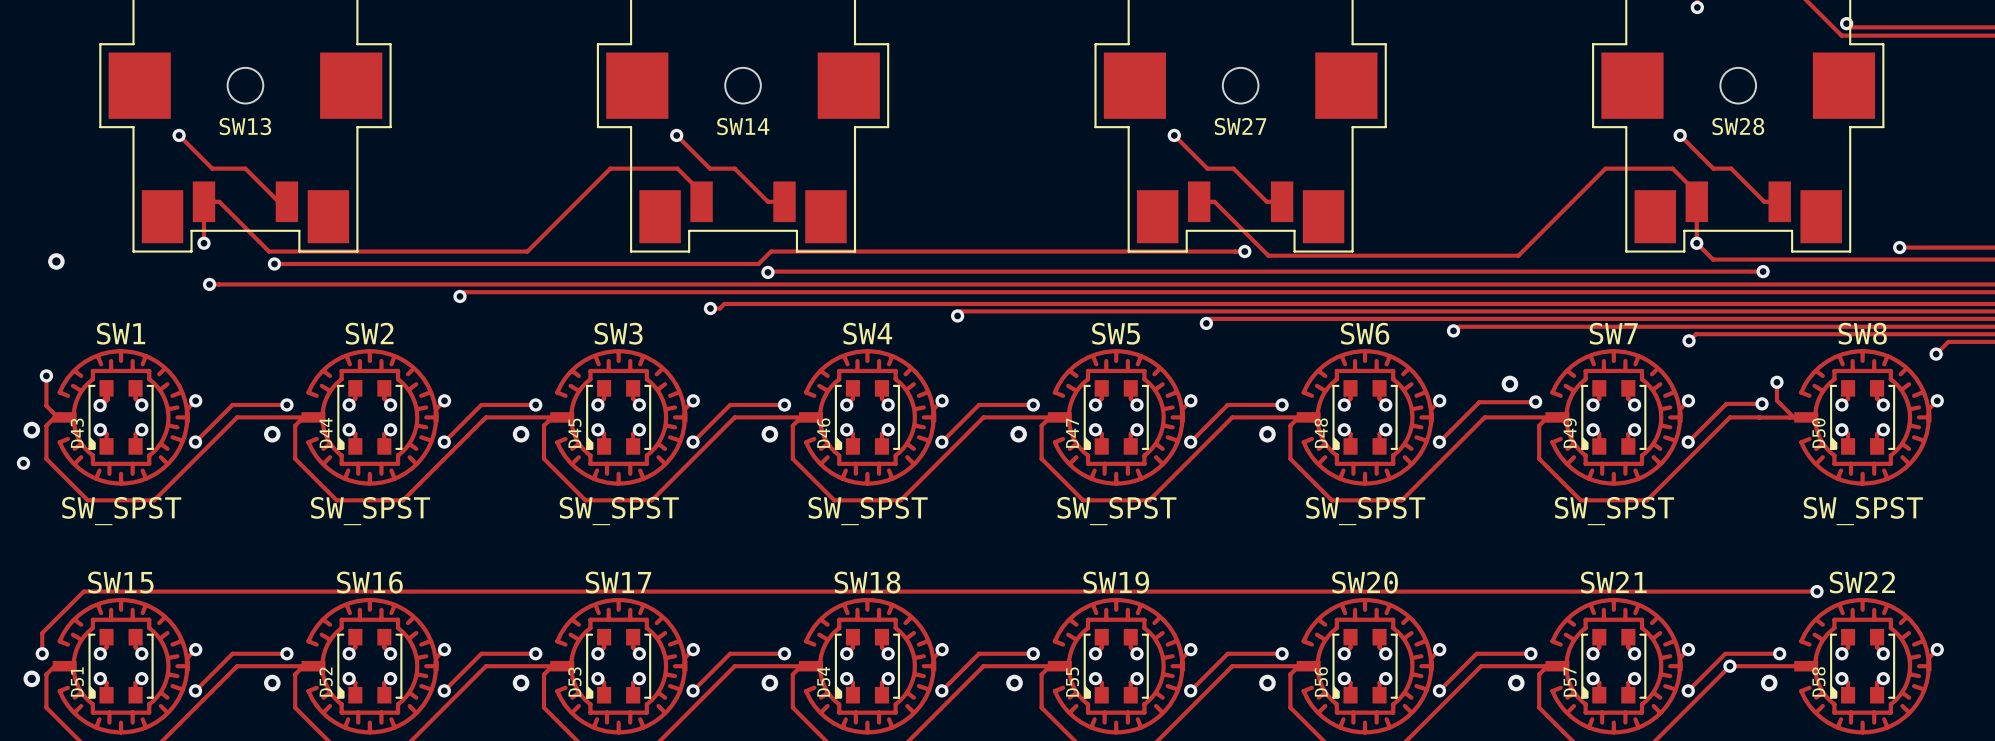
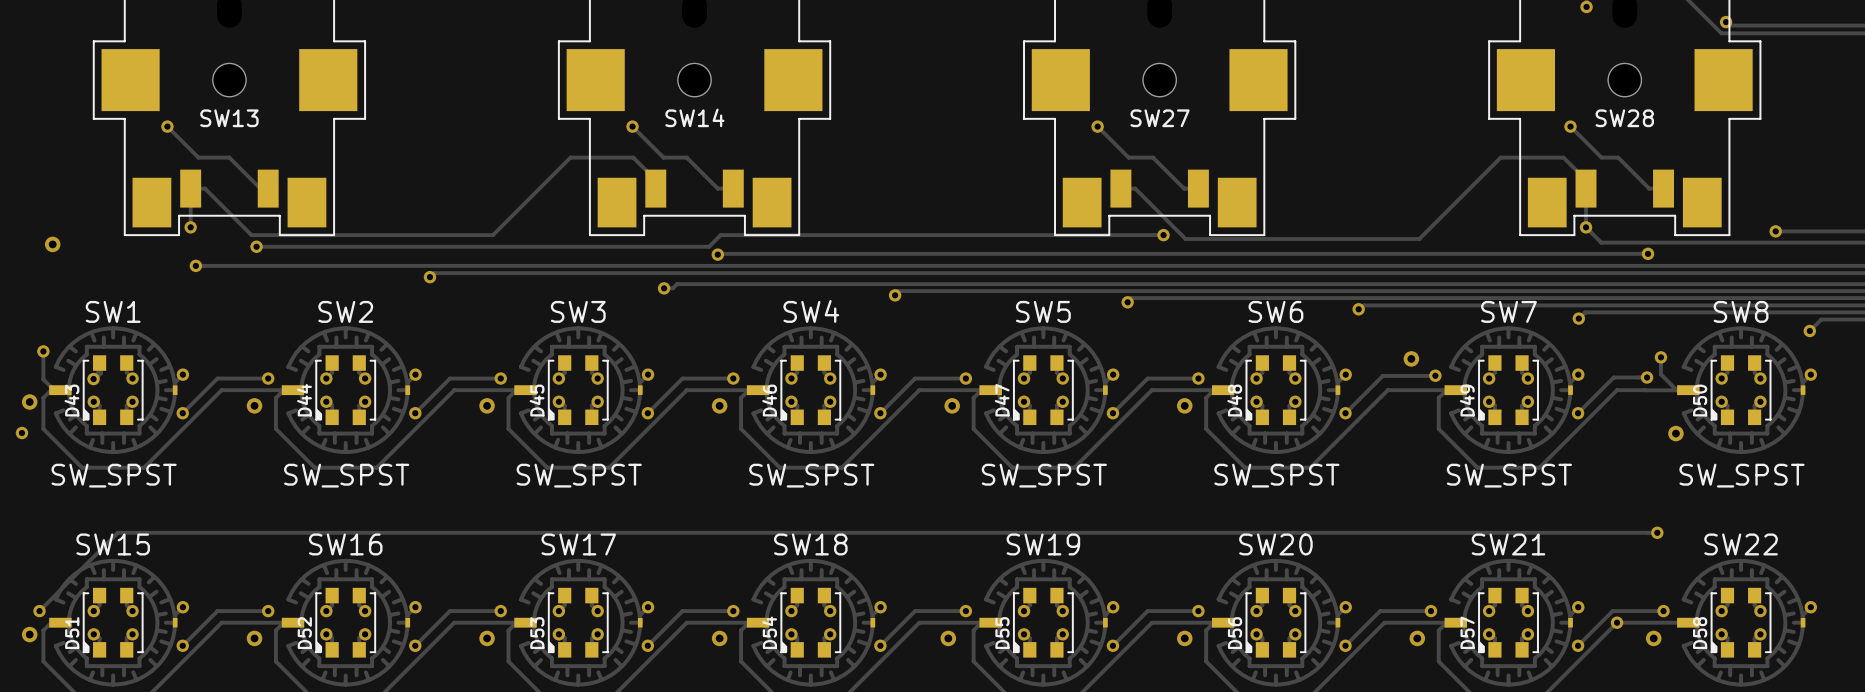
via: none -> (1675, 433)
track: (1817, 591) (83, 591) (42, 633) (42, 653) -> (1657, 532) (117, 532) (39, 611)
via position: (1817, 591) -> (1657, 532)

